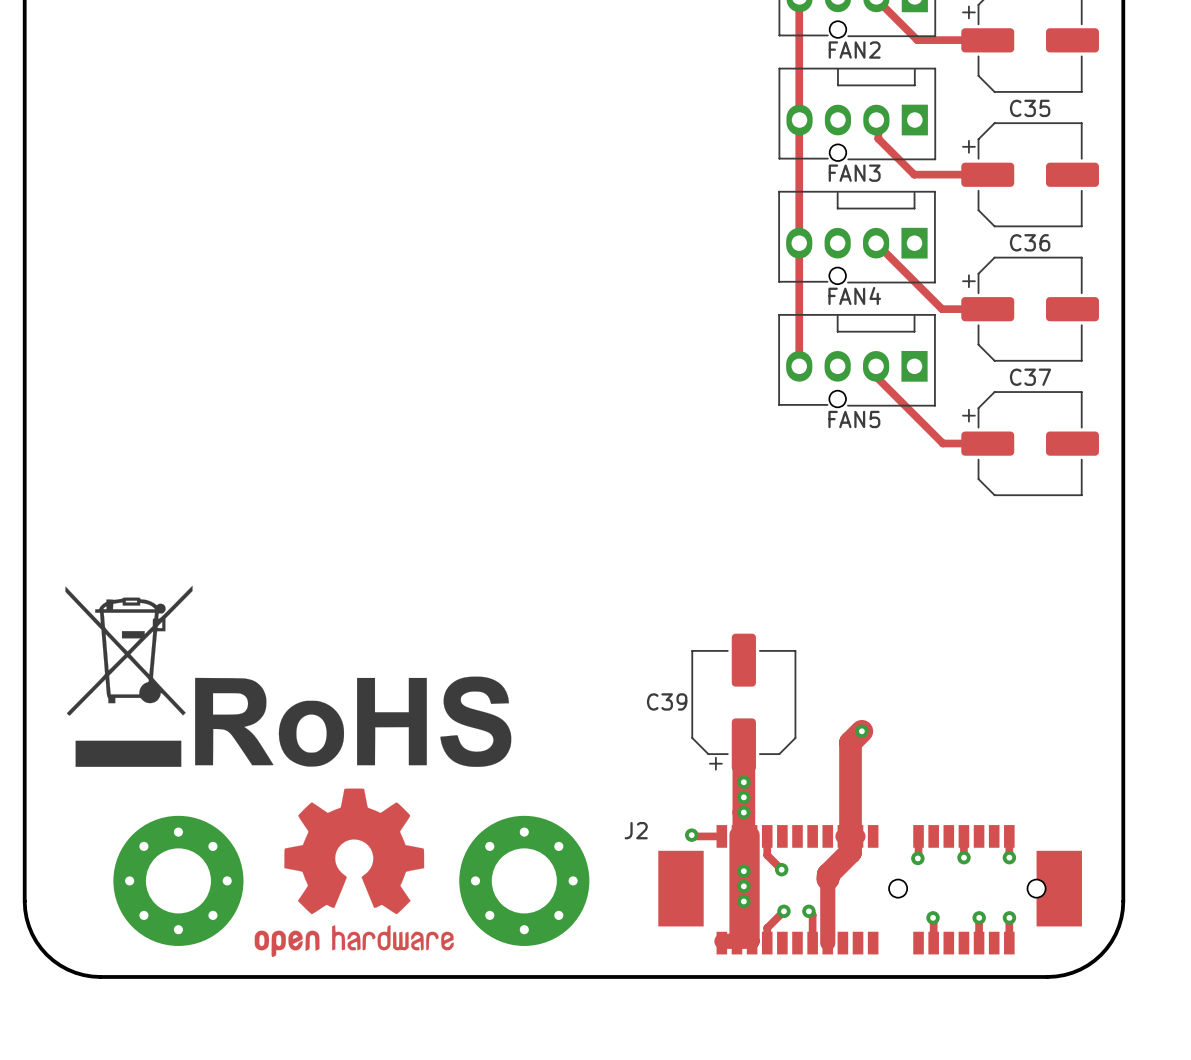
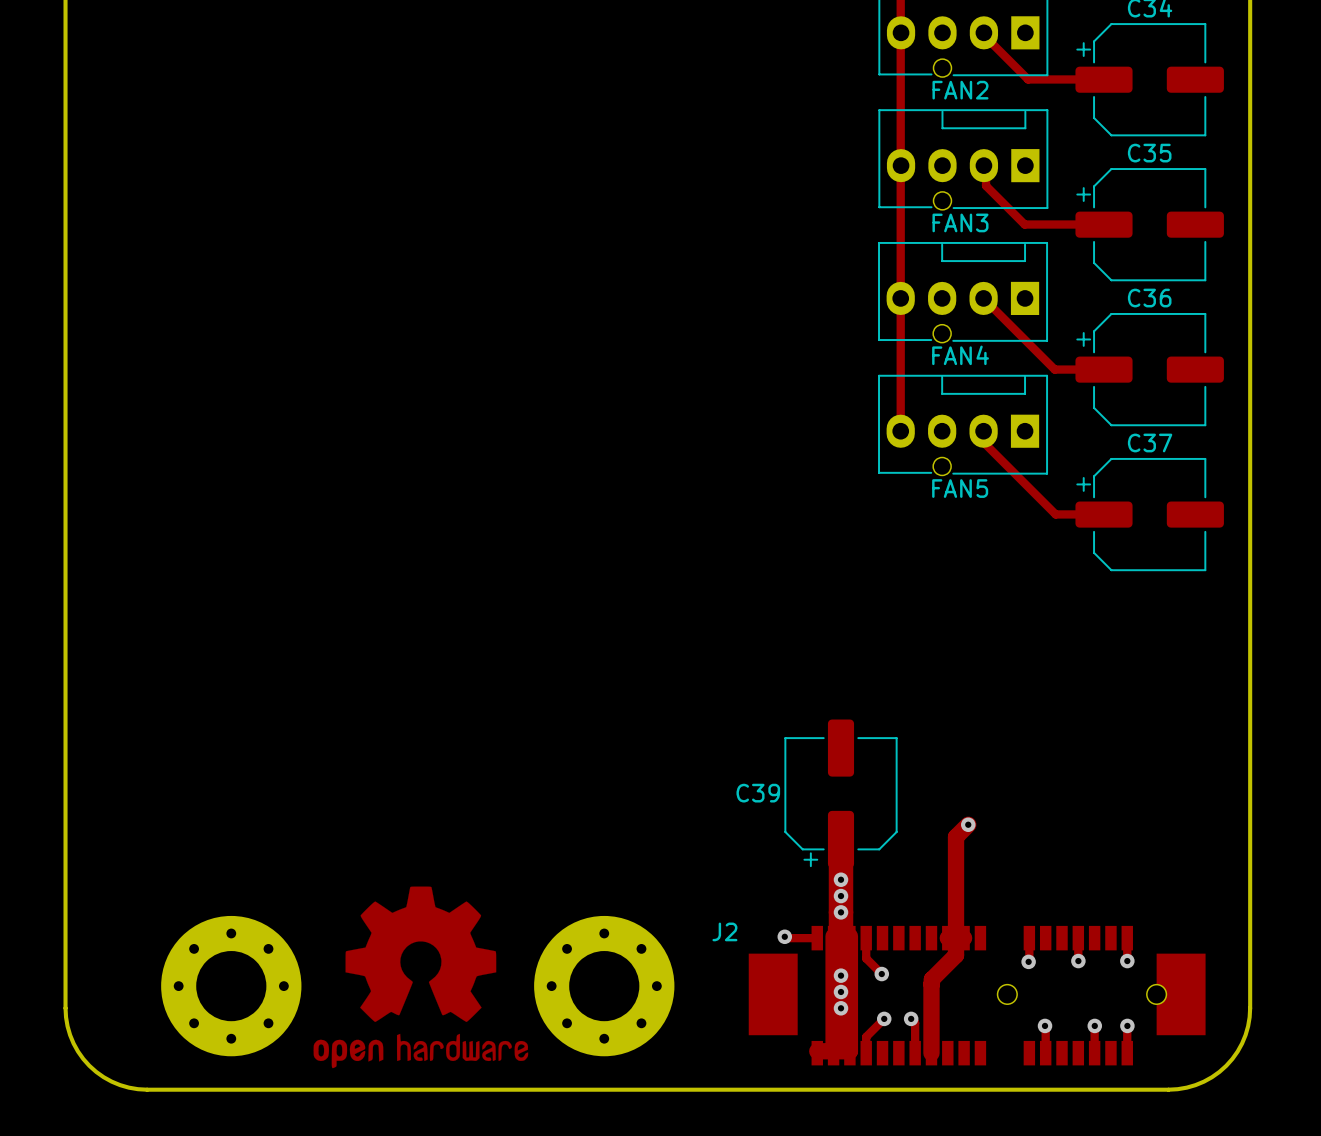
drawing: [65, 585, 512, 767] -> none
track width: thick (861, 731) (850, 742) (850, 852) (828, 874) (827, 879) -> thin (968, 824) (956, 836) (956, 955) (931, 979) (931, 984)

